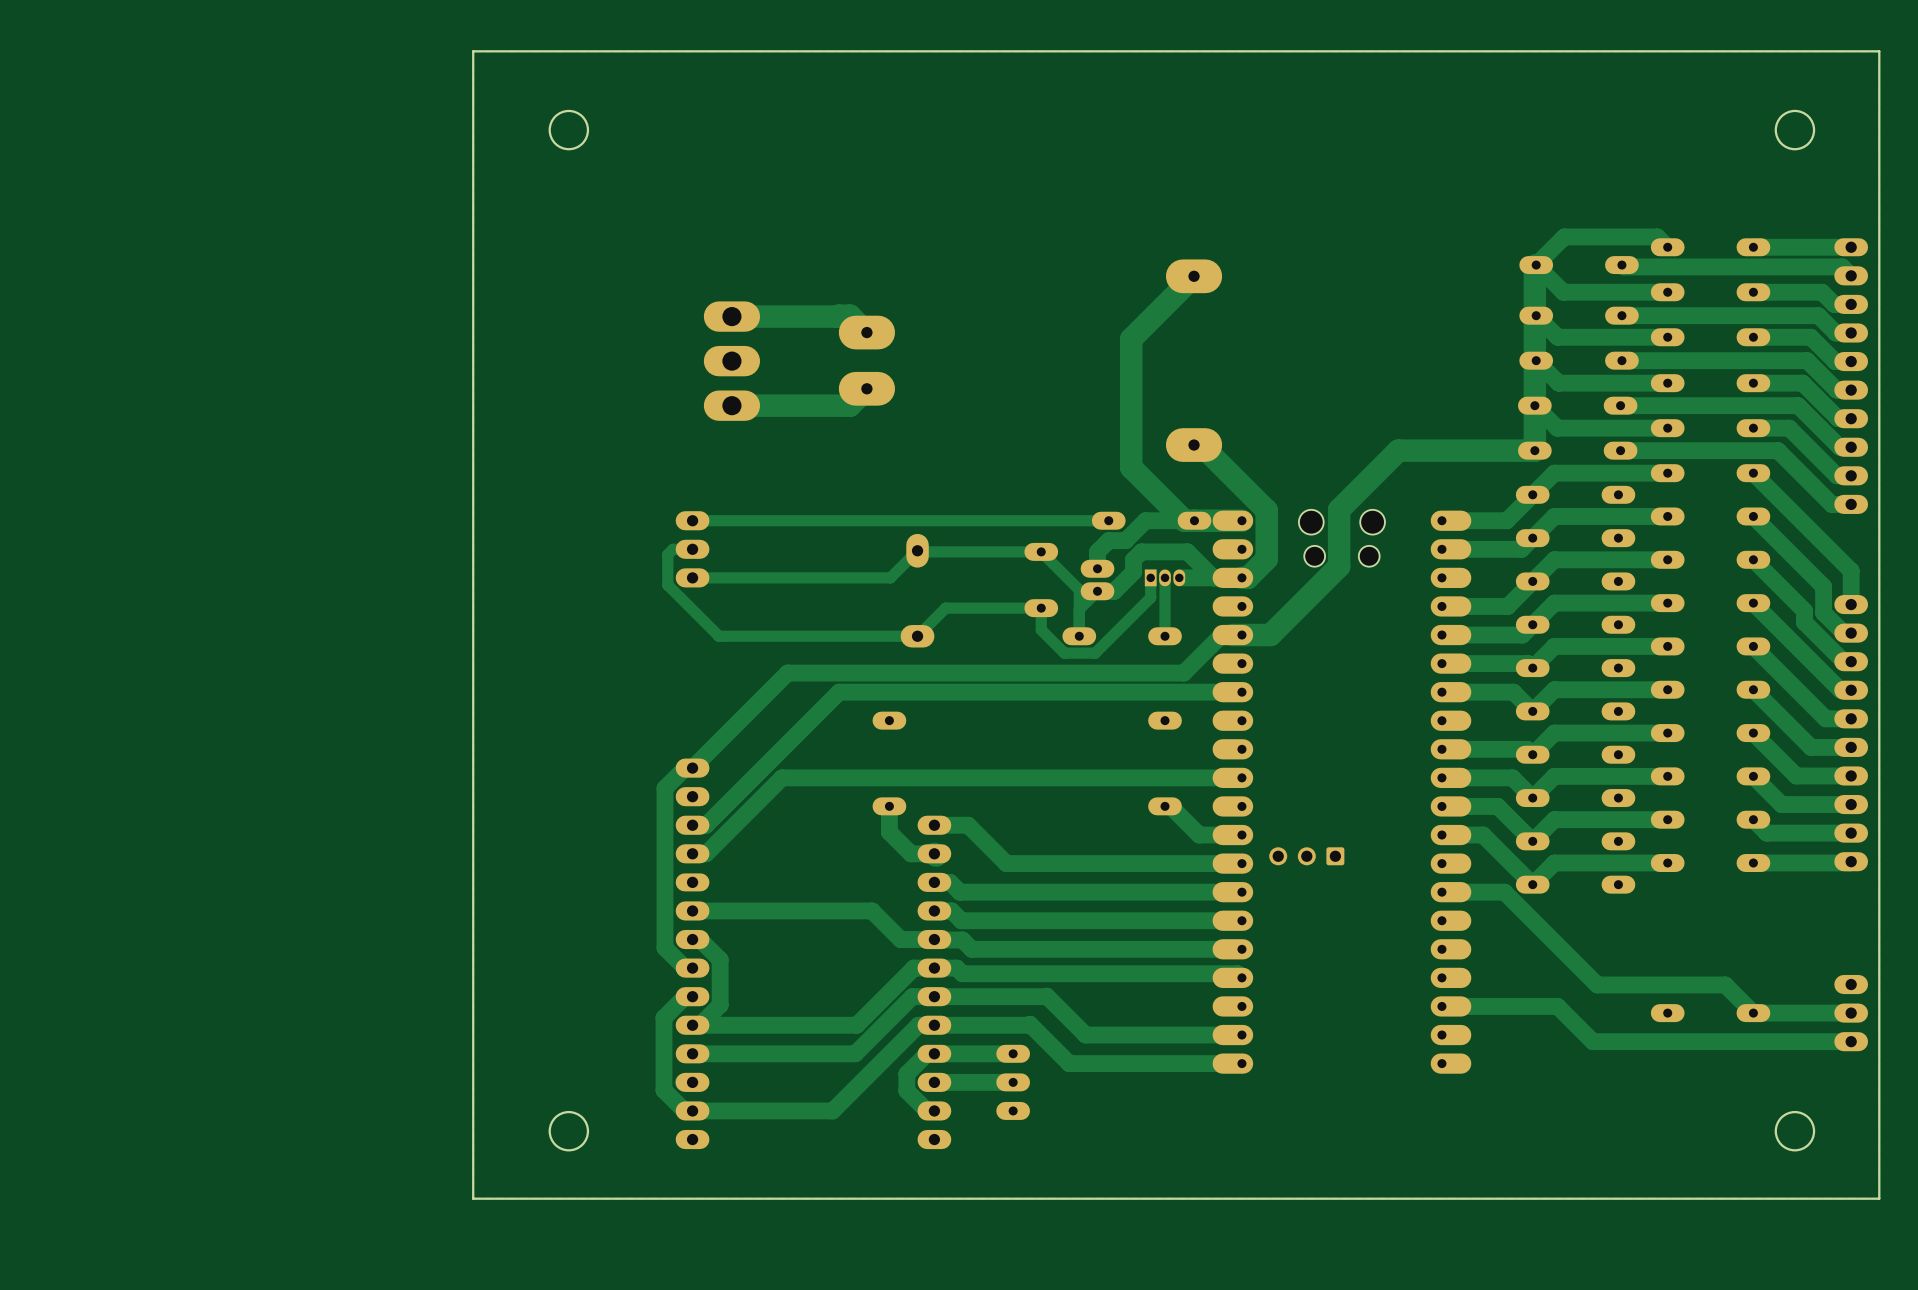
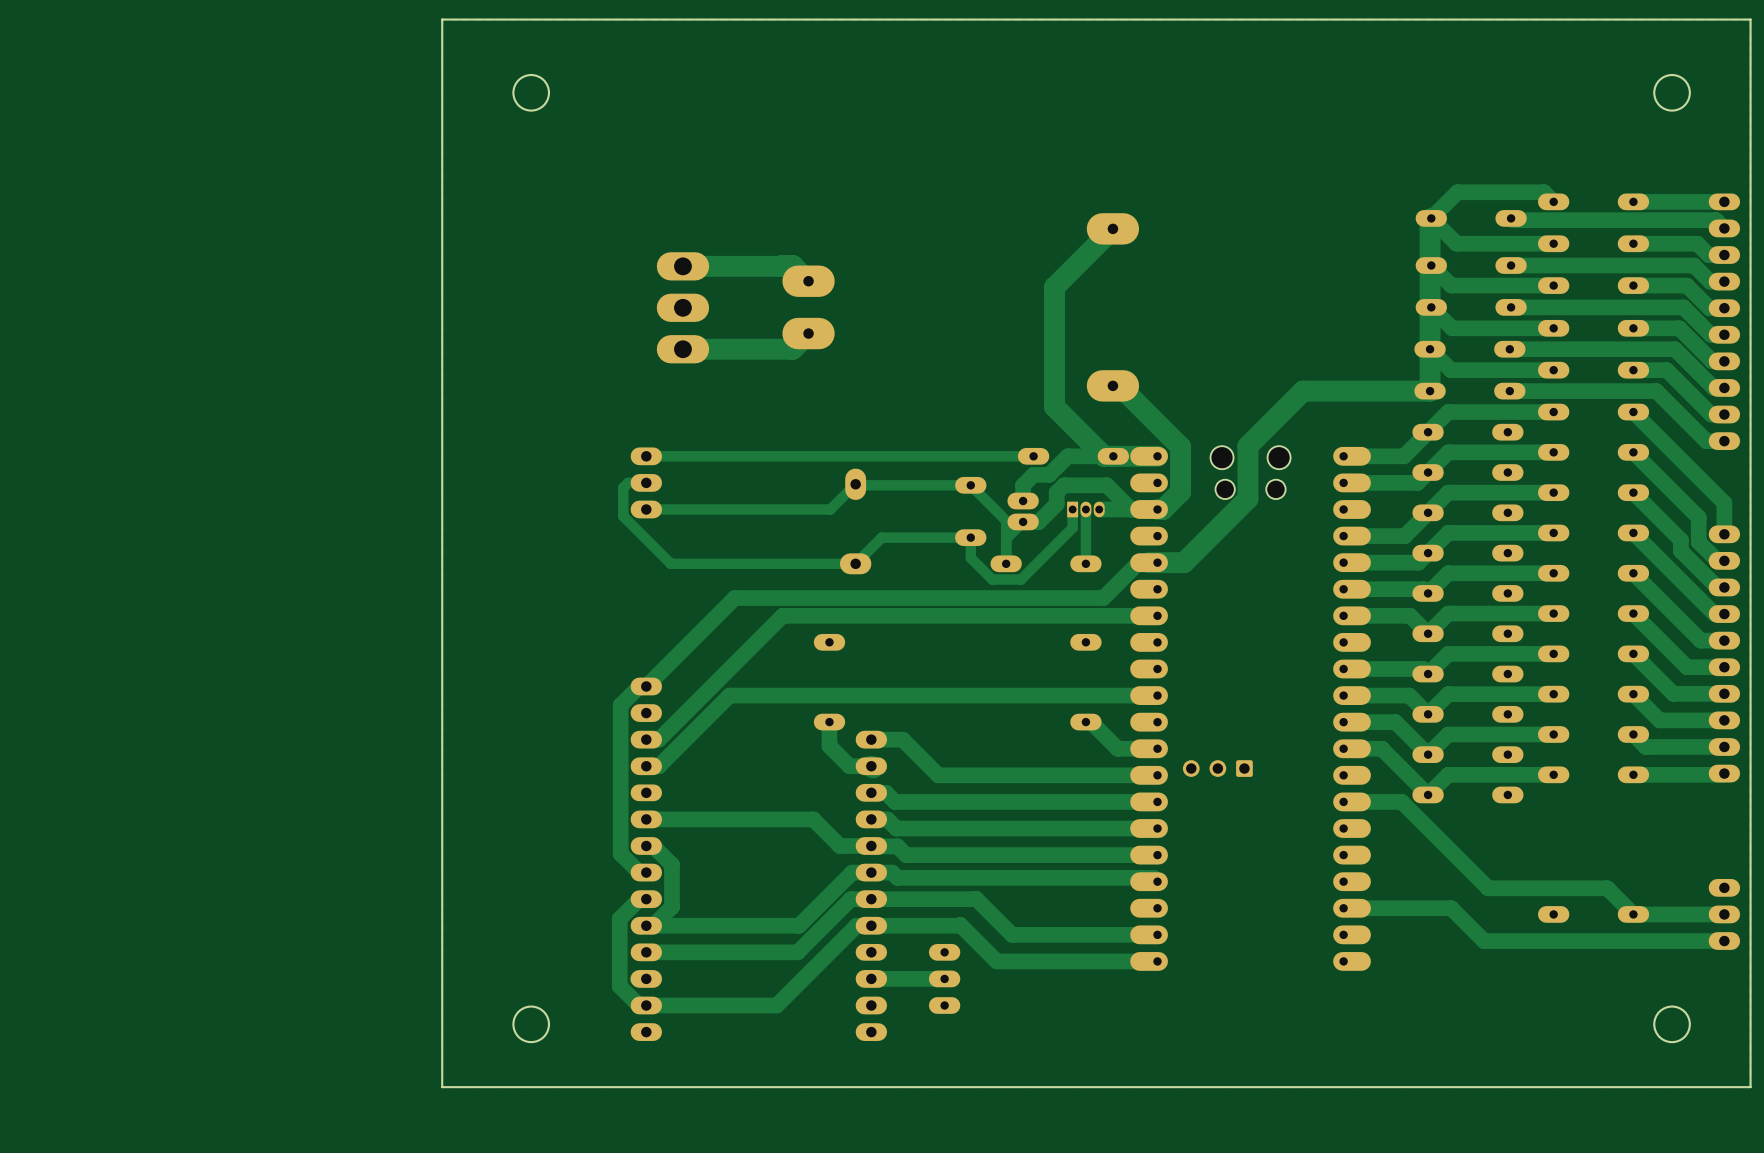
track: (1013, 1053) (927, 1053) (906, 1074) (906, 1090) (927, 1110) (934, 1110) -> none

